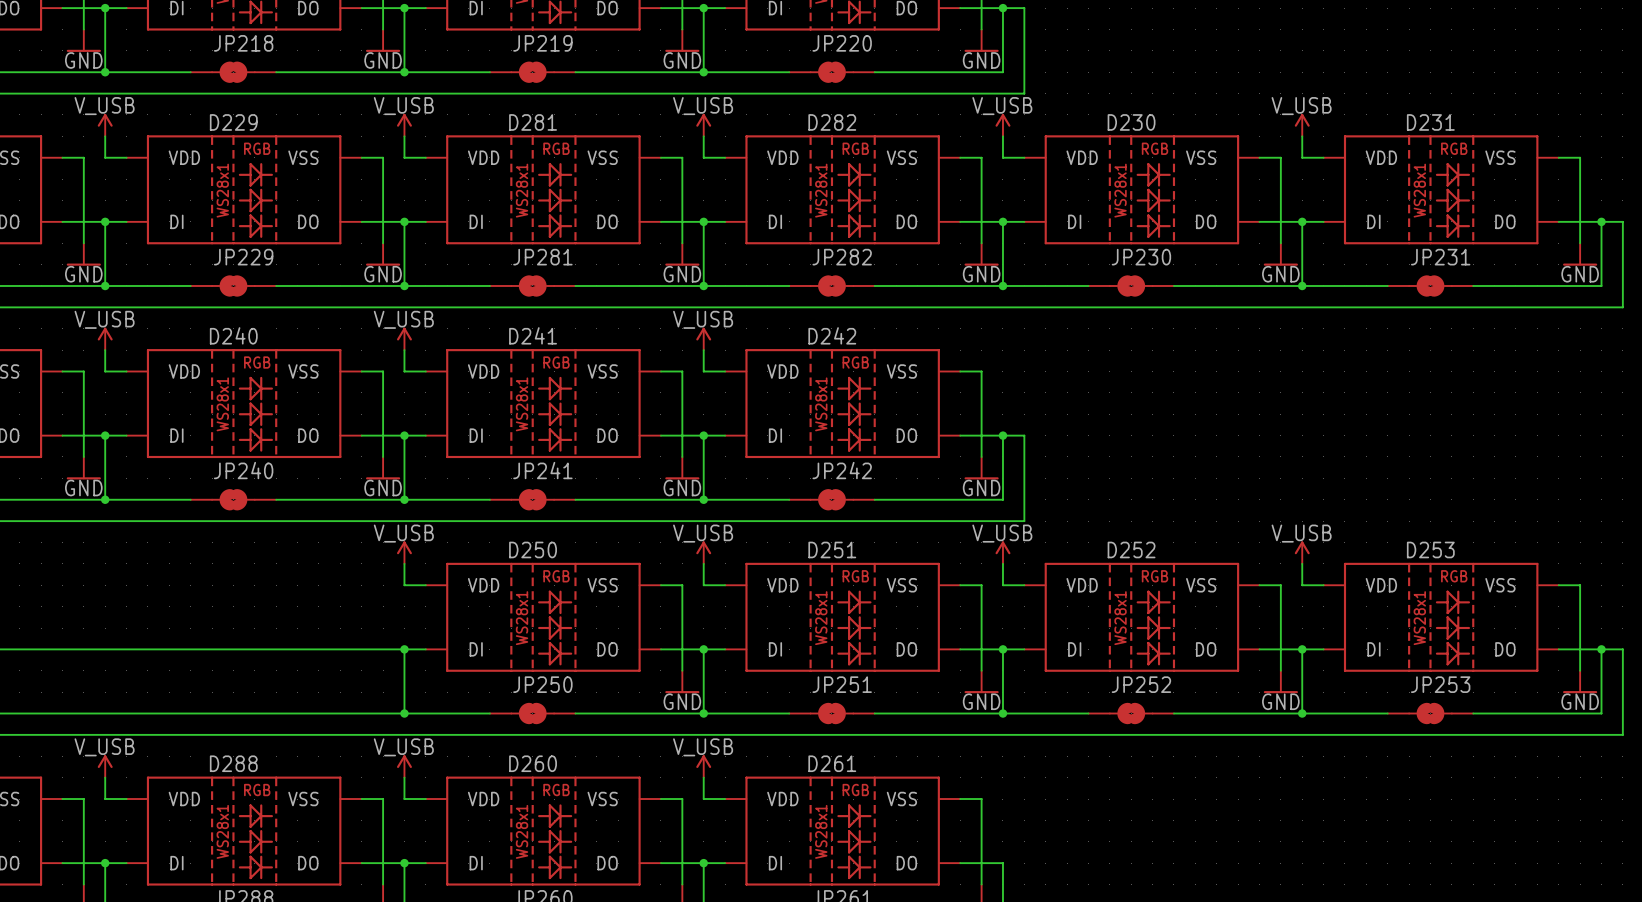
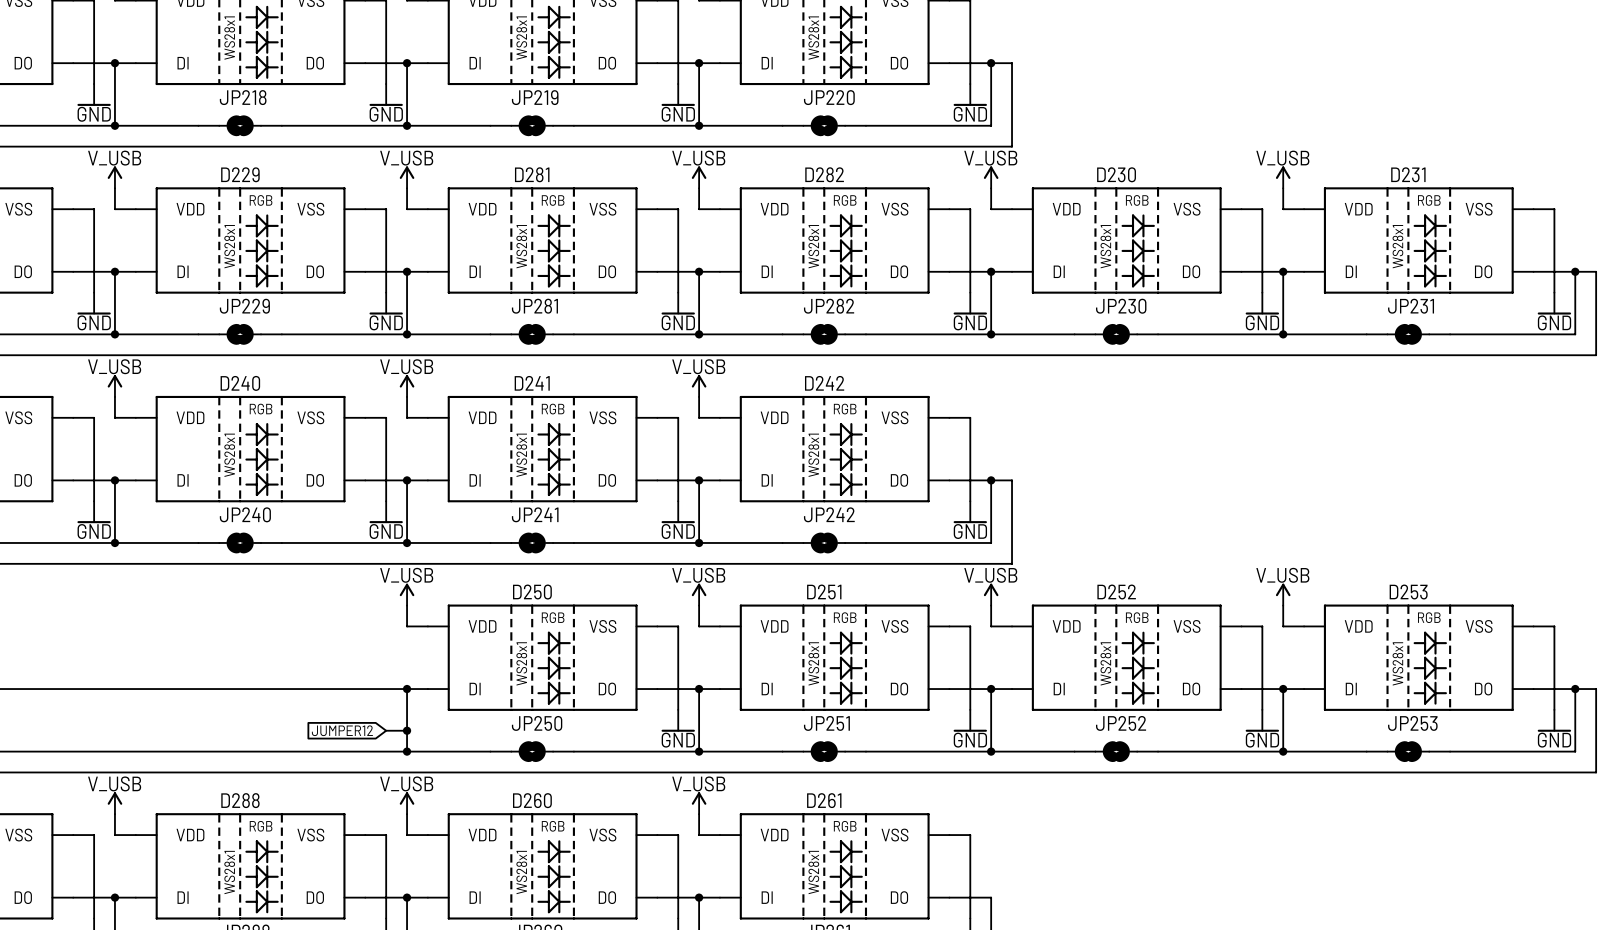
global label: none -> JUMPER12 (342, 730)
wire: none -> (386, 730) (407, 730)
junction: none -> (407, 730)

